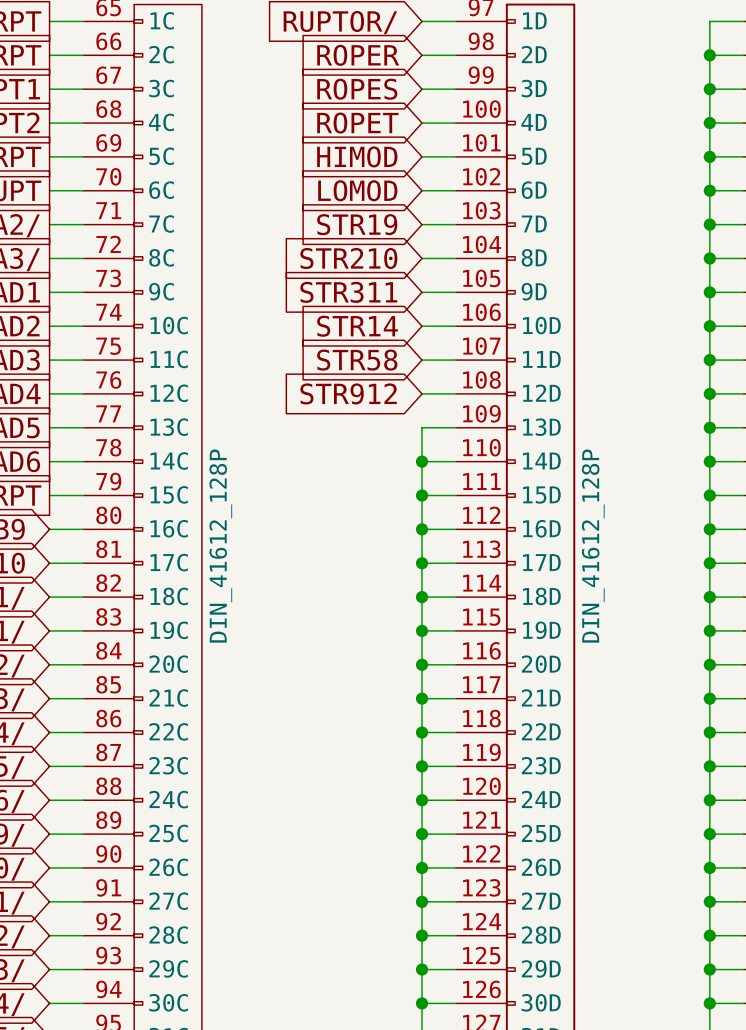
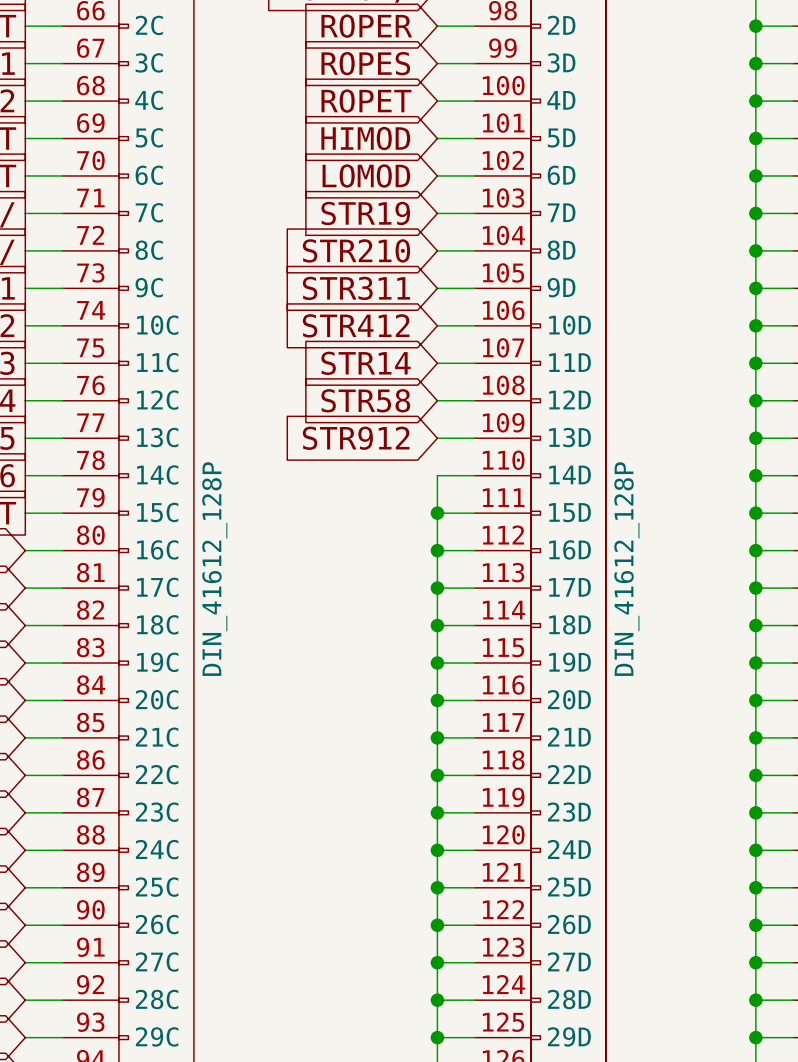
global label: STR14 (357, 326) -> STR412 (356, 325)
global label: STR58 (357, 360) -> STR14 (366, 363)
global label: STR912 (348, 393) -> STR58 (365, 400)
global label: none -> STR912 (356, 438)
wire: (422, 427) (422, 461) -> none
junction: (422, 461) -> none

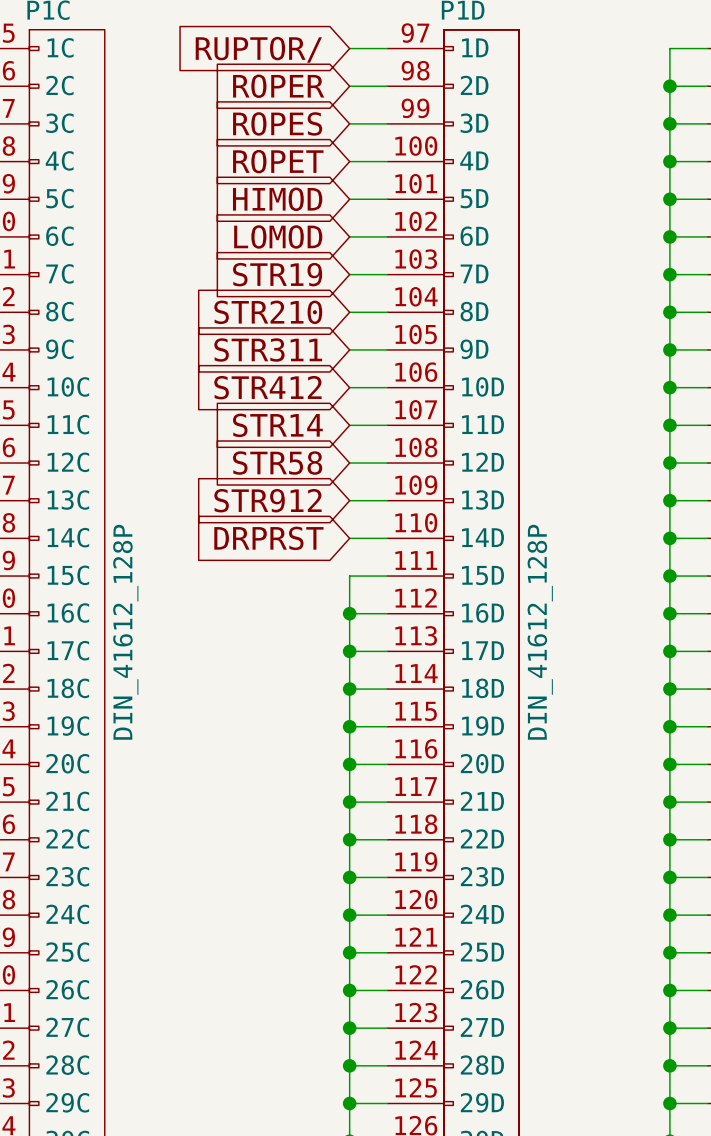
global label: none -> DRPRST (268, 538)
wire: (437, 475) (437, 513) -> none
junction: (437, 513) -> none

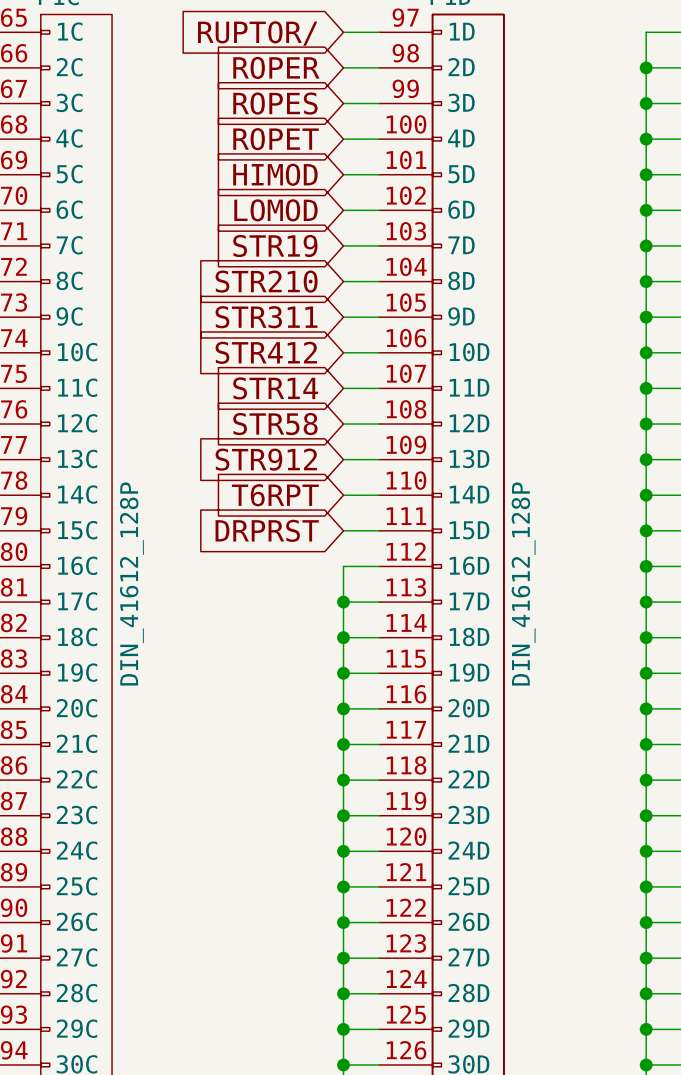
global label: DRPRST (268, 538) -> T6RPT (275, 495)
global label: none -> DRPRST (267, 530)
wire: (349, 576) (349, 613) -> none
junction: (349, 613) -> none

